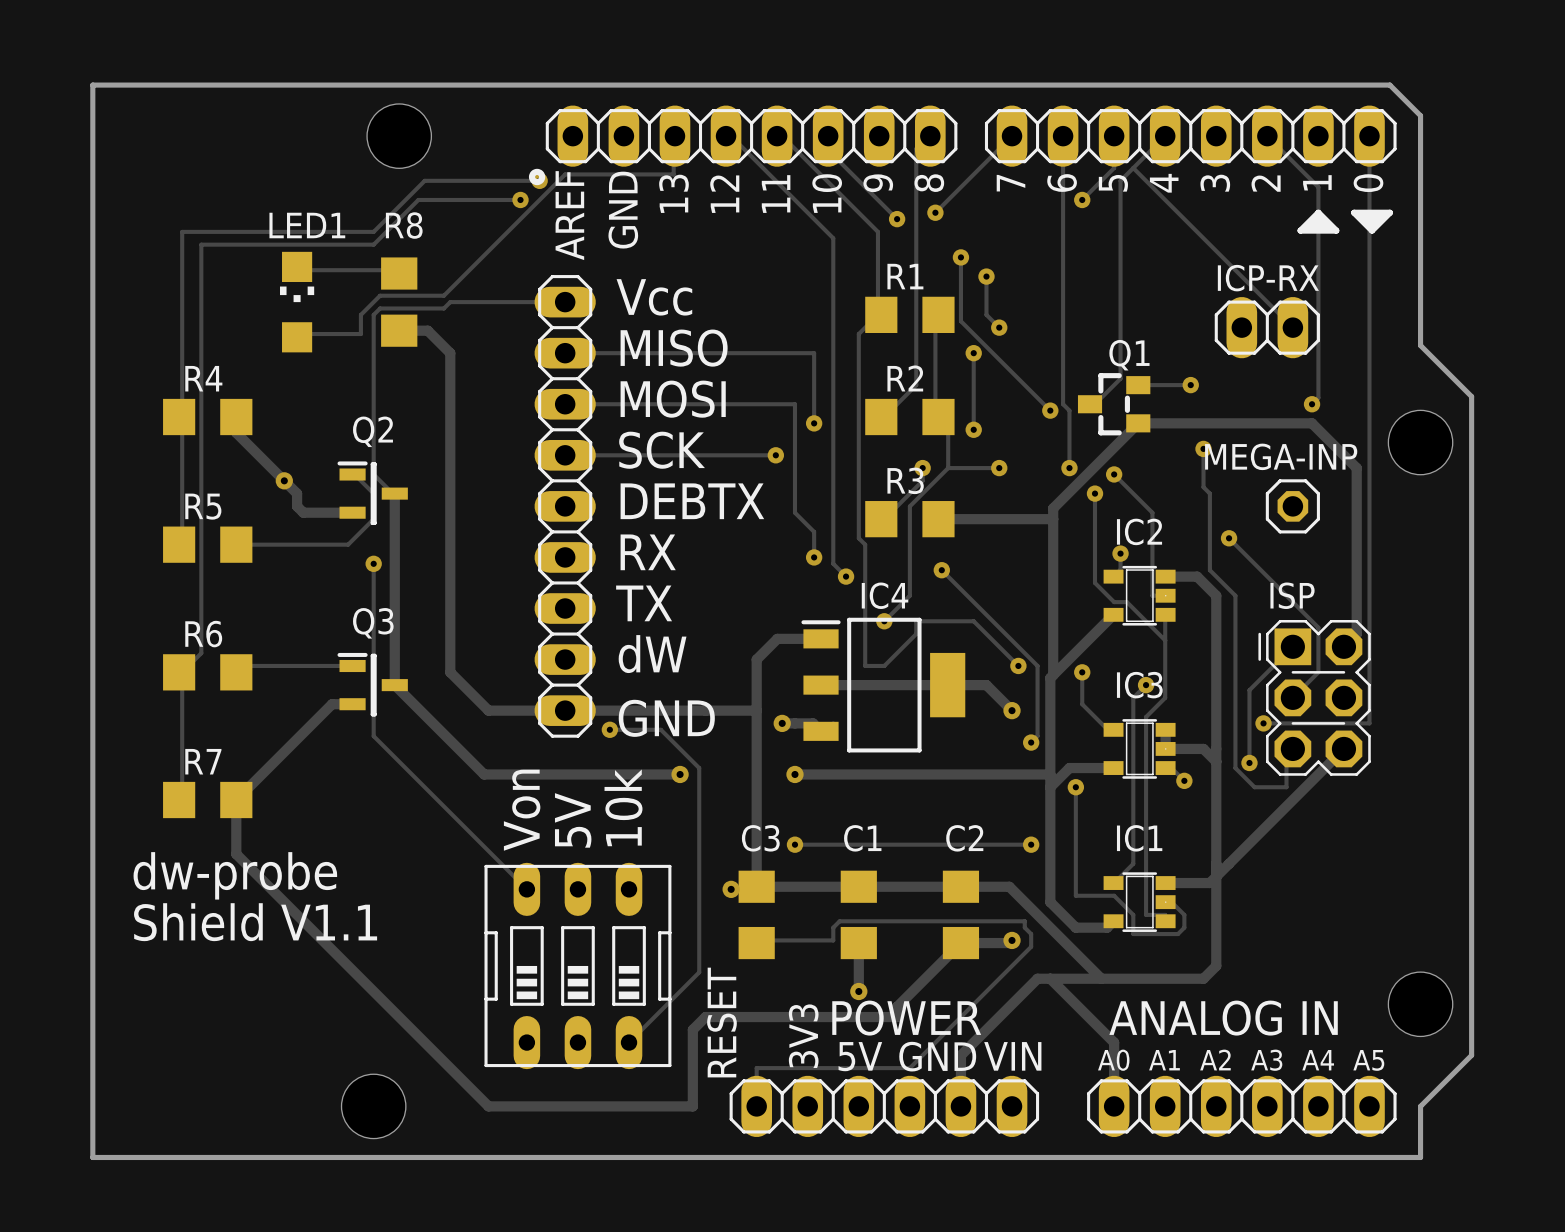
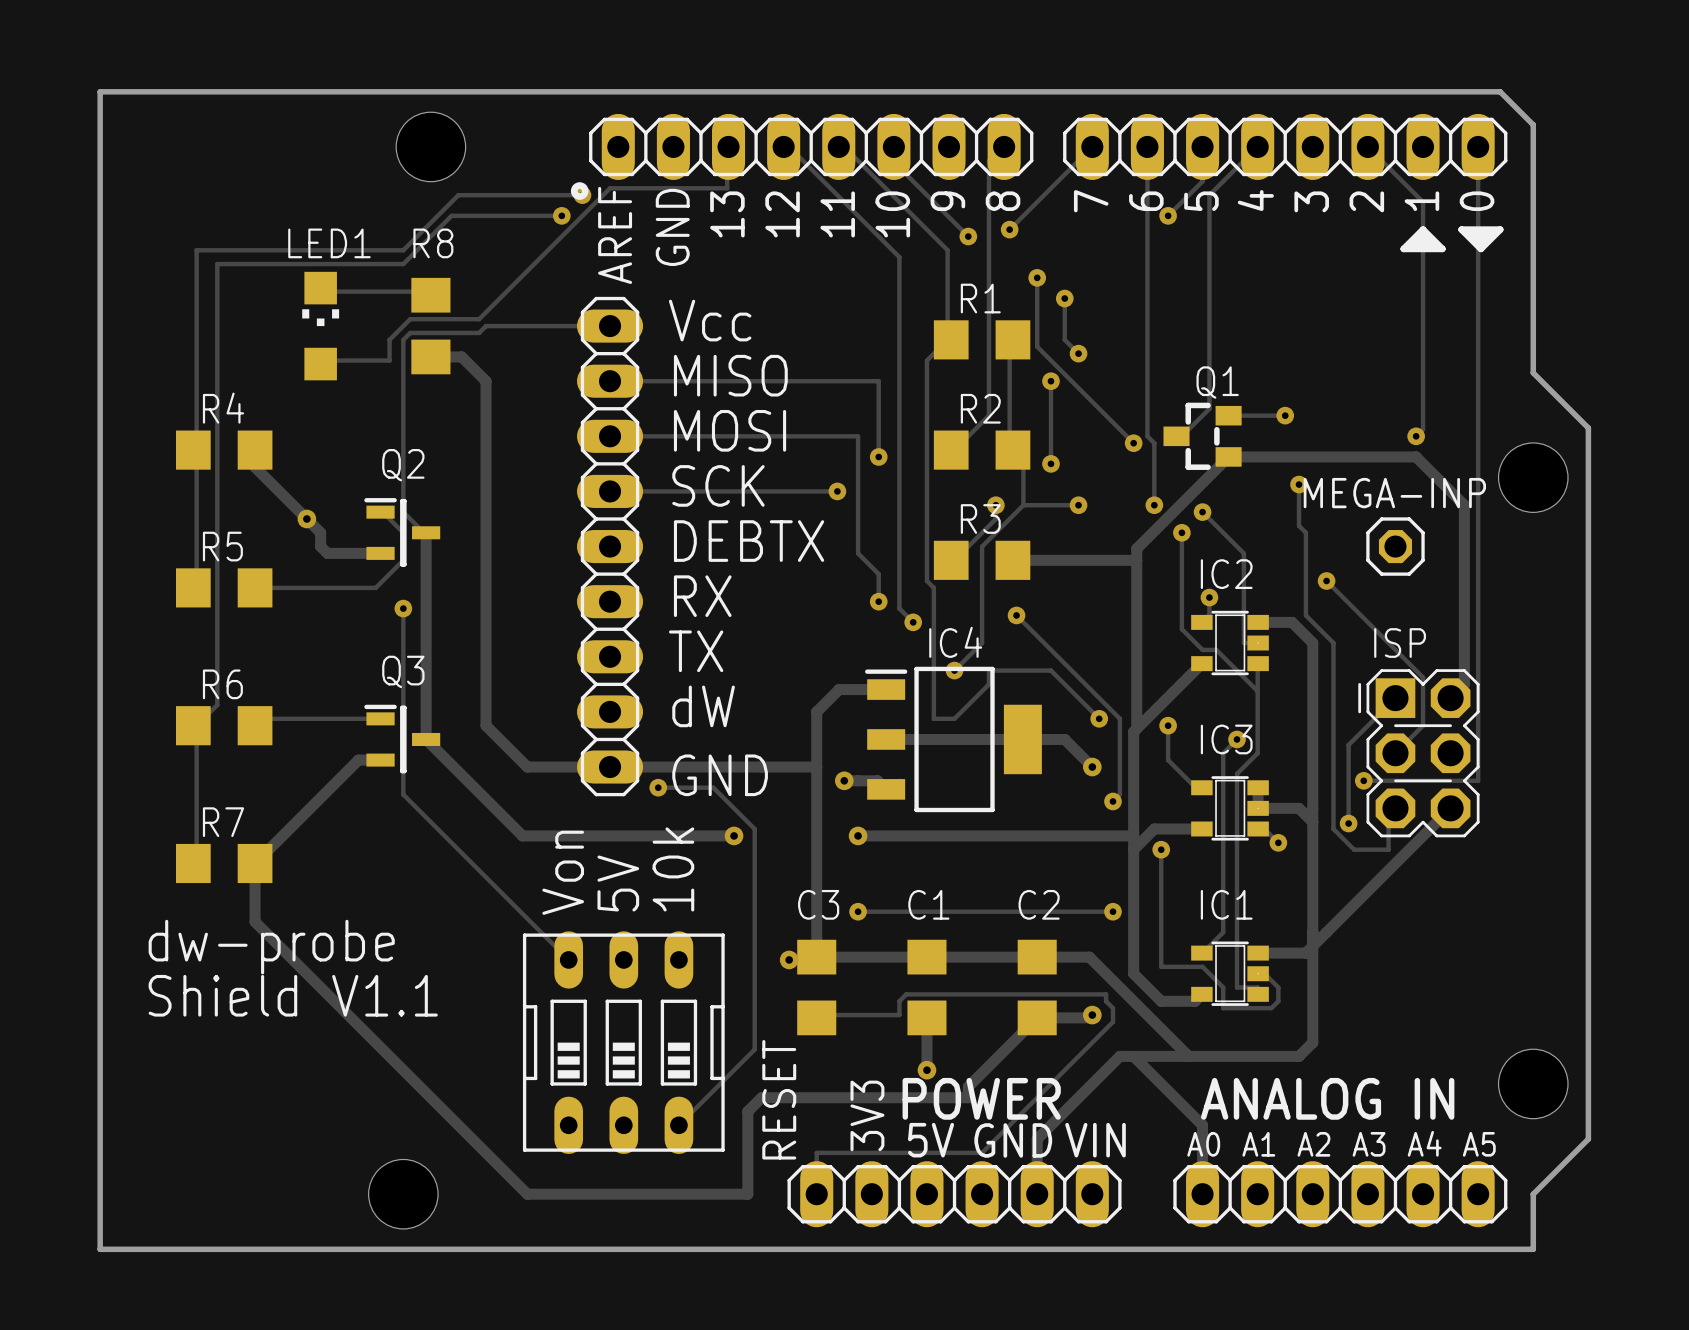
track: (1133, 168) (1292, 327) -> none
ICP-RX: (1267, 327) -> none

